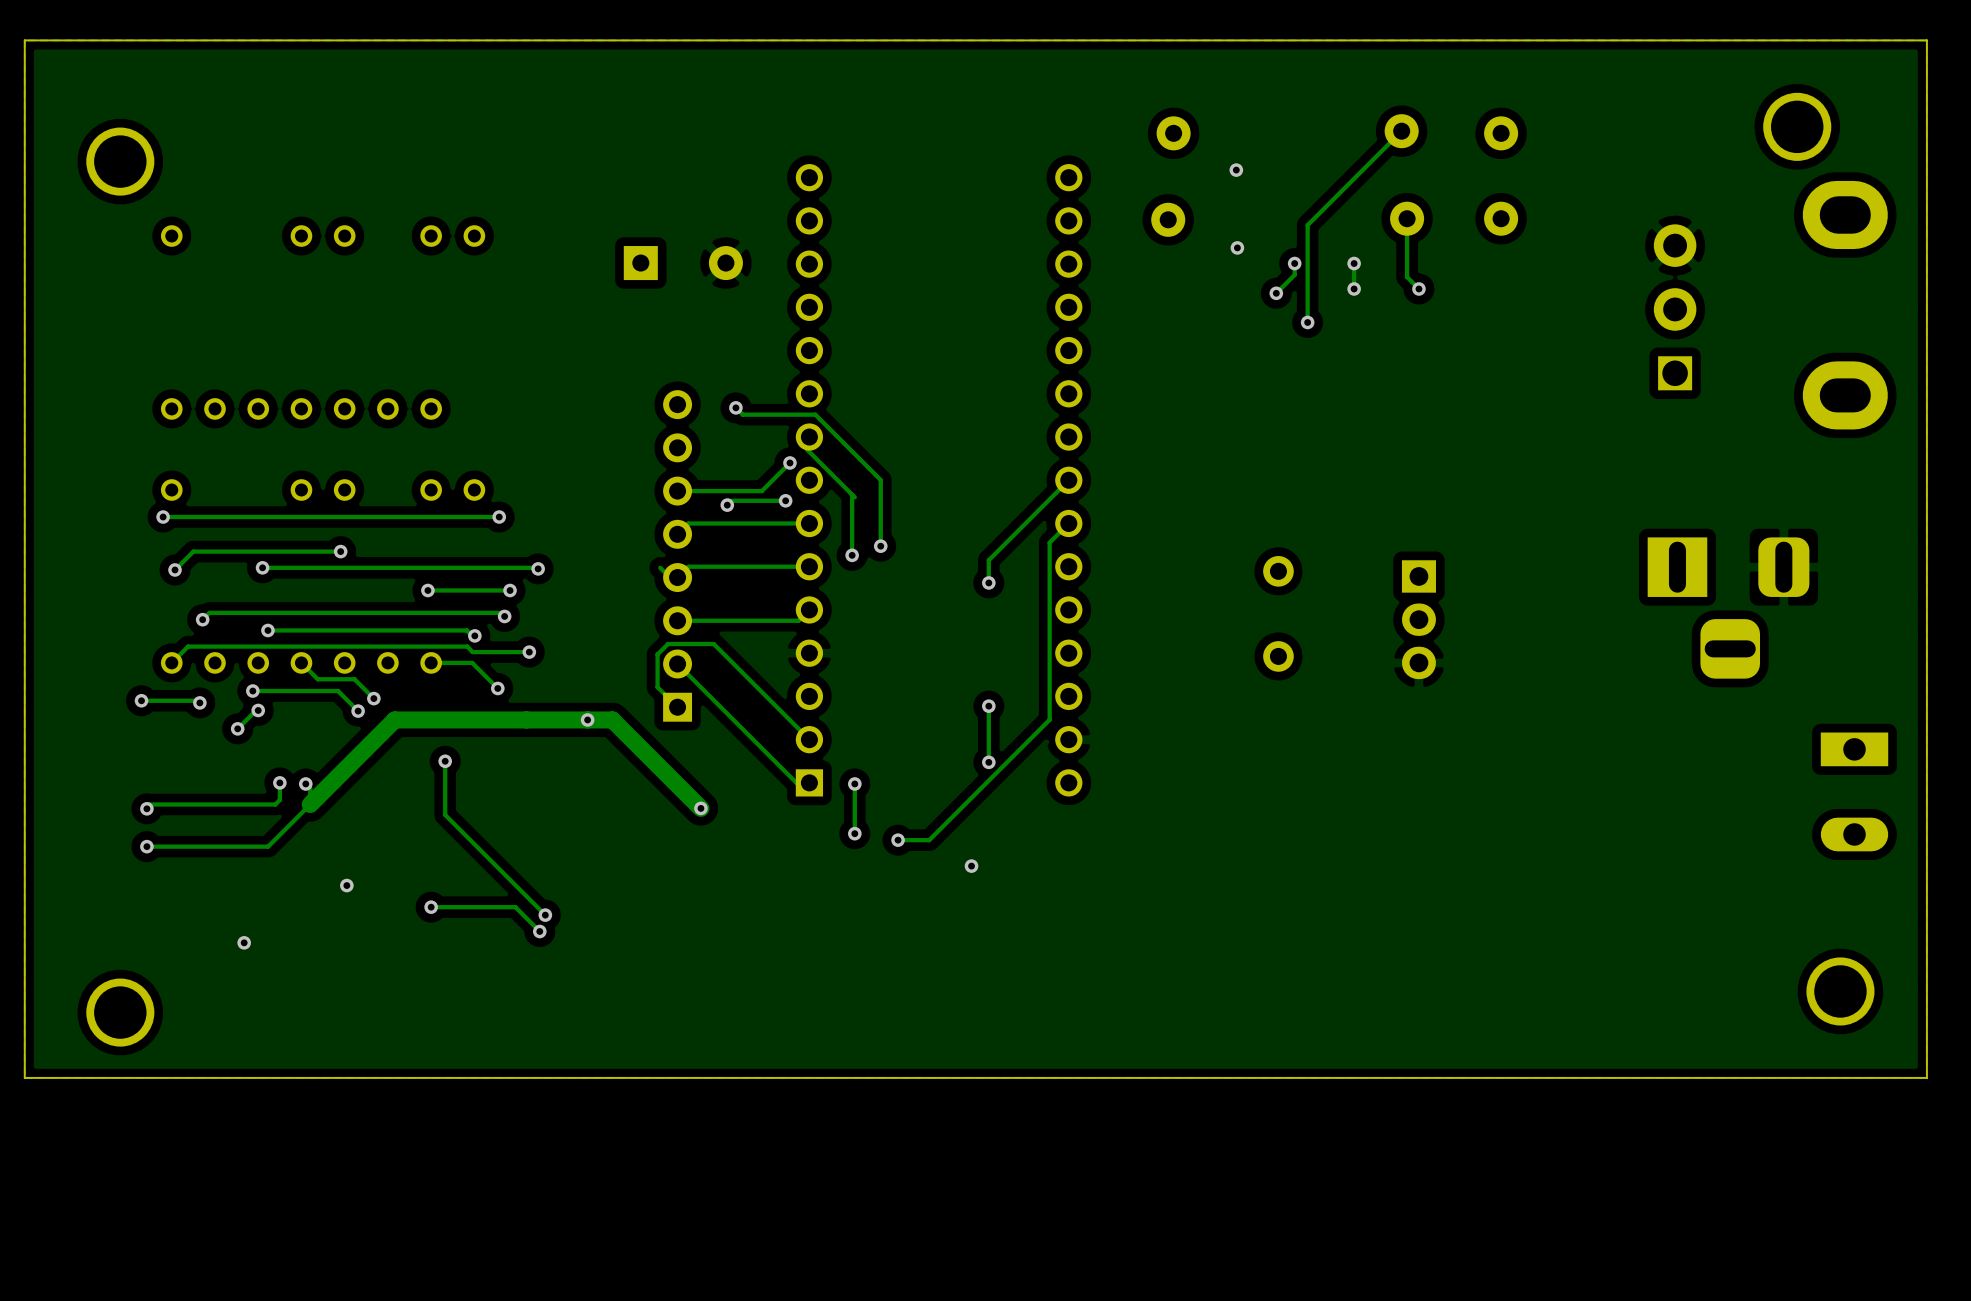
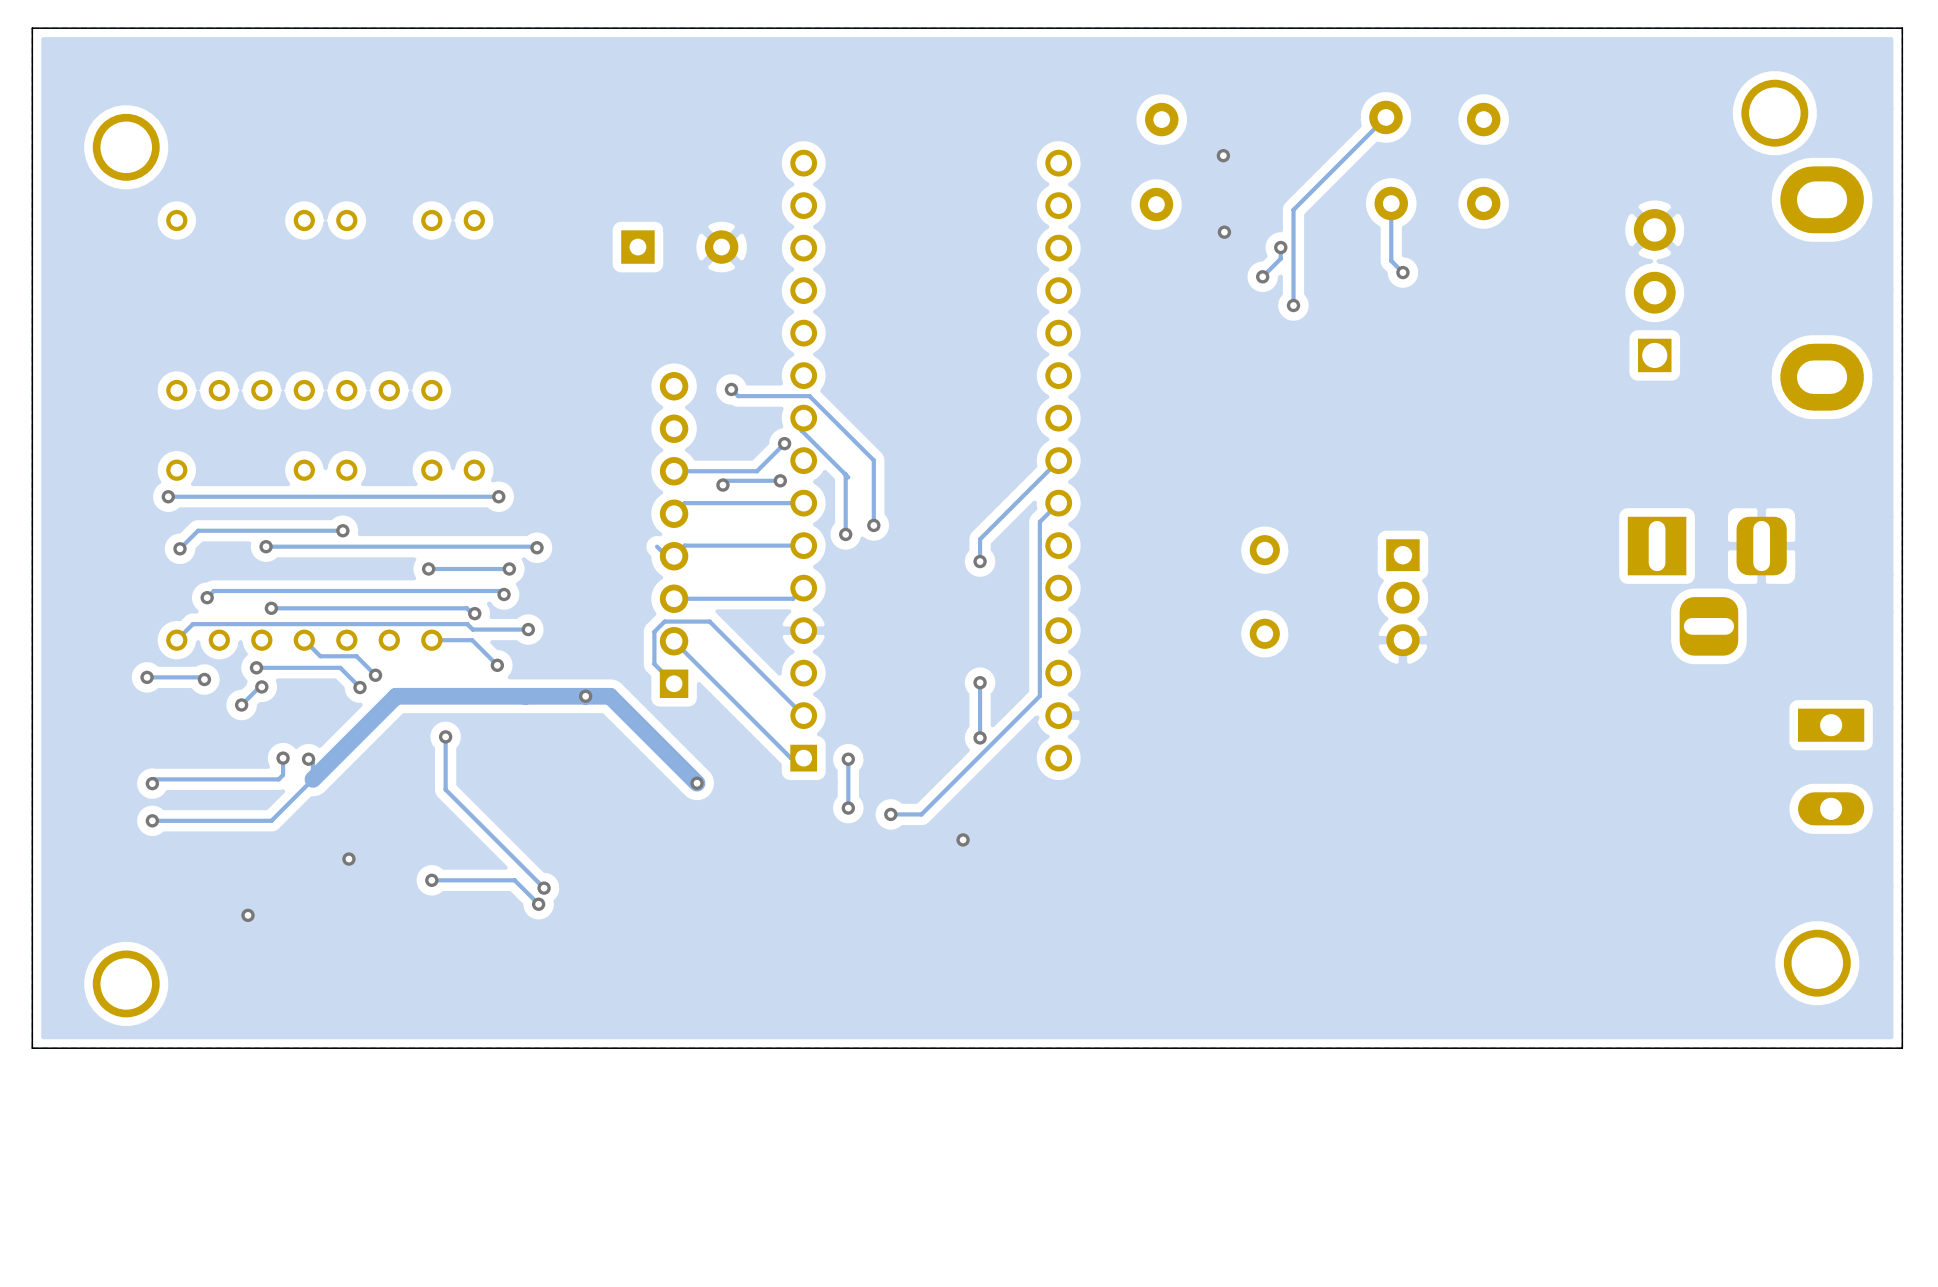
track: (1354, 263) (1354, 288) -> none
via: (1354, 263) -> none
via: (1354, 288) -> none

